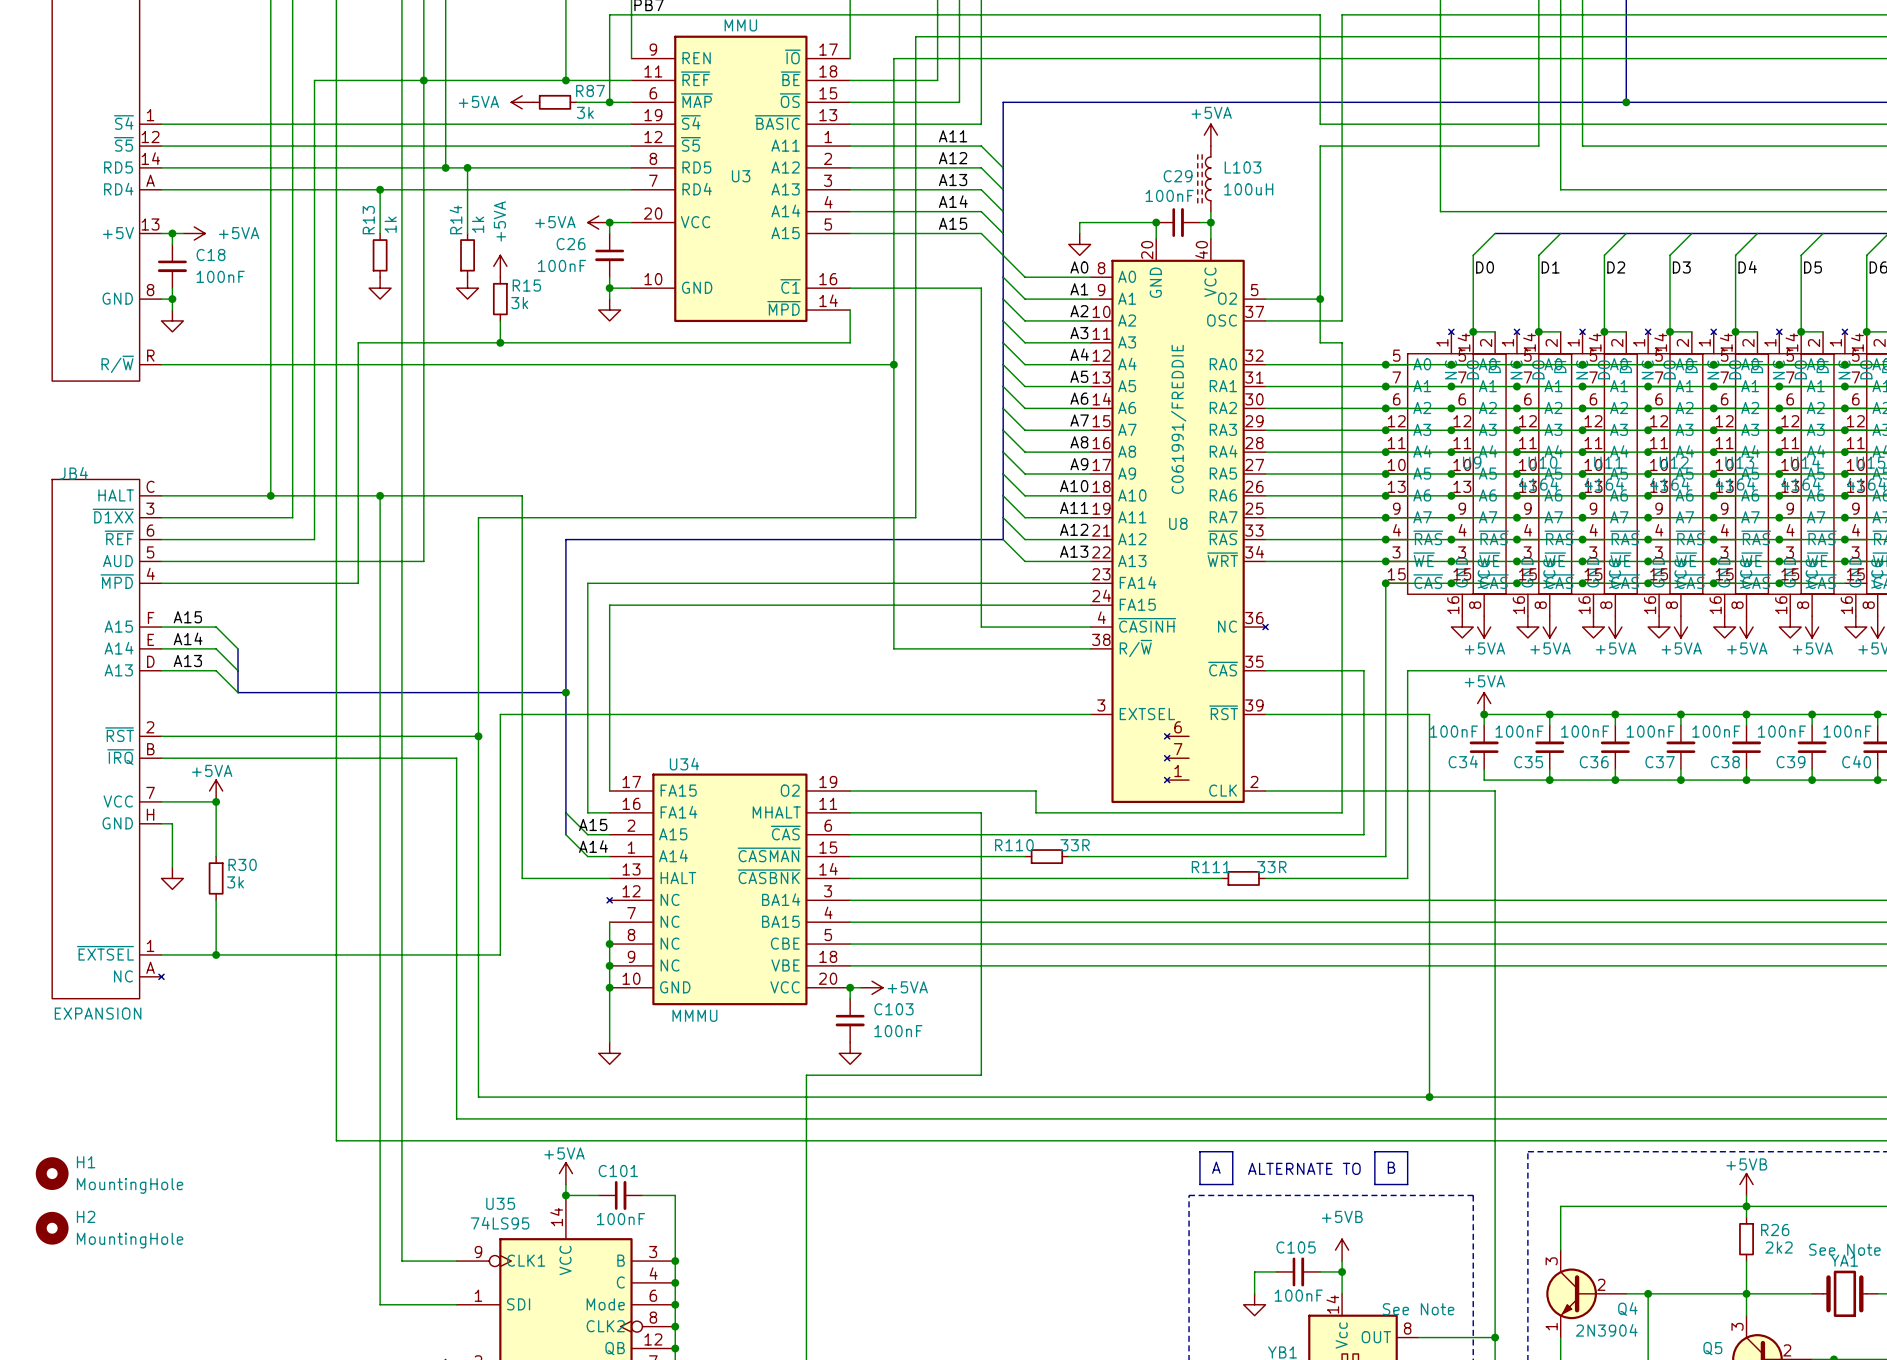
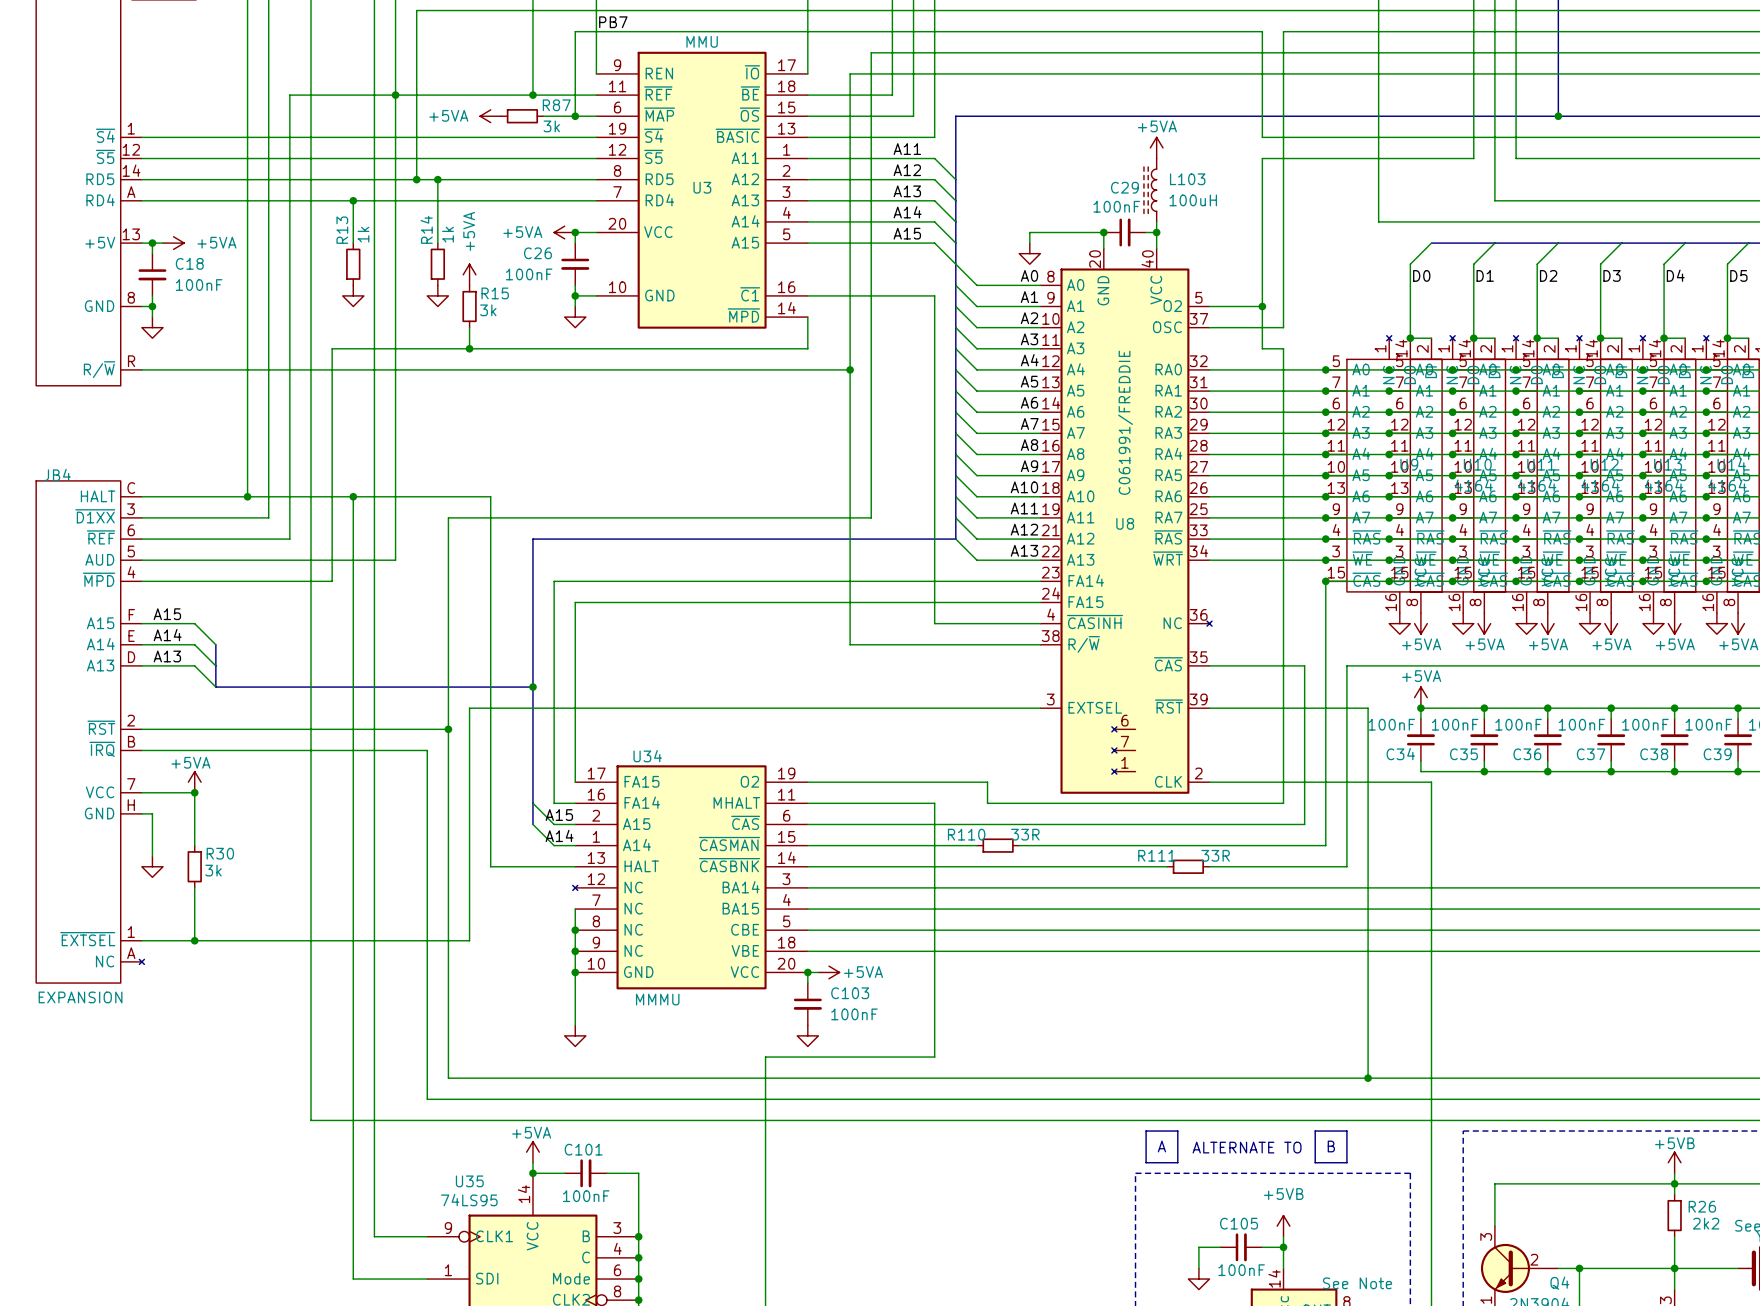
H1: MountingHole (52, 1173) -> none
H2: MountingHole (52, 1228) -> none

